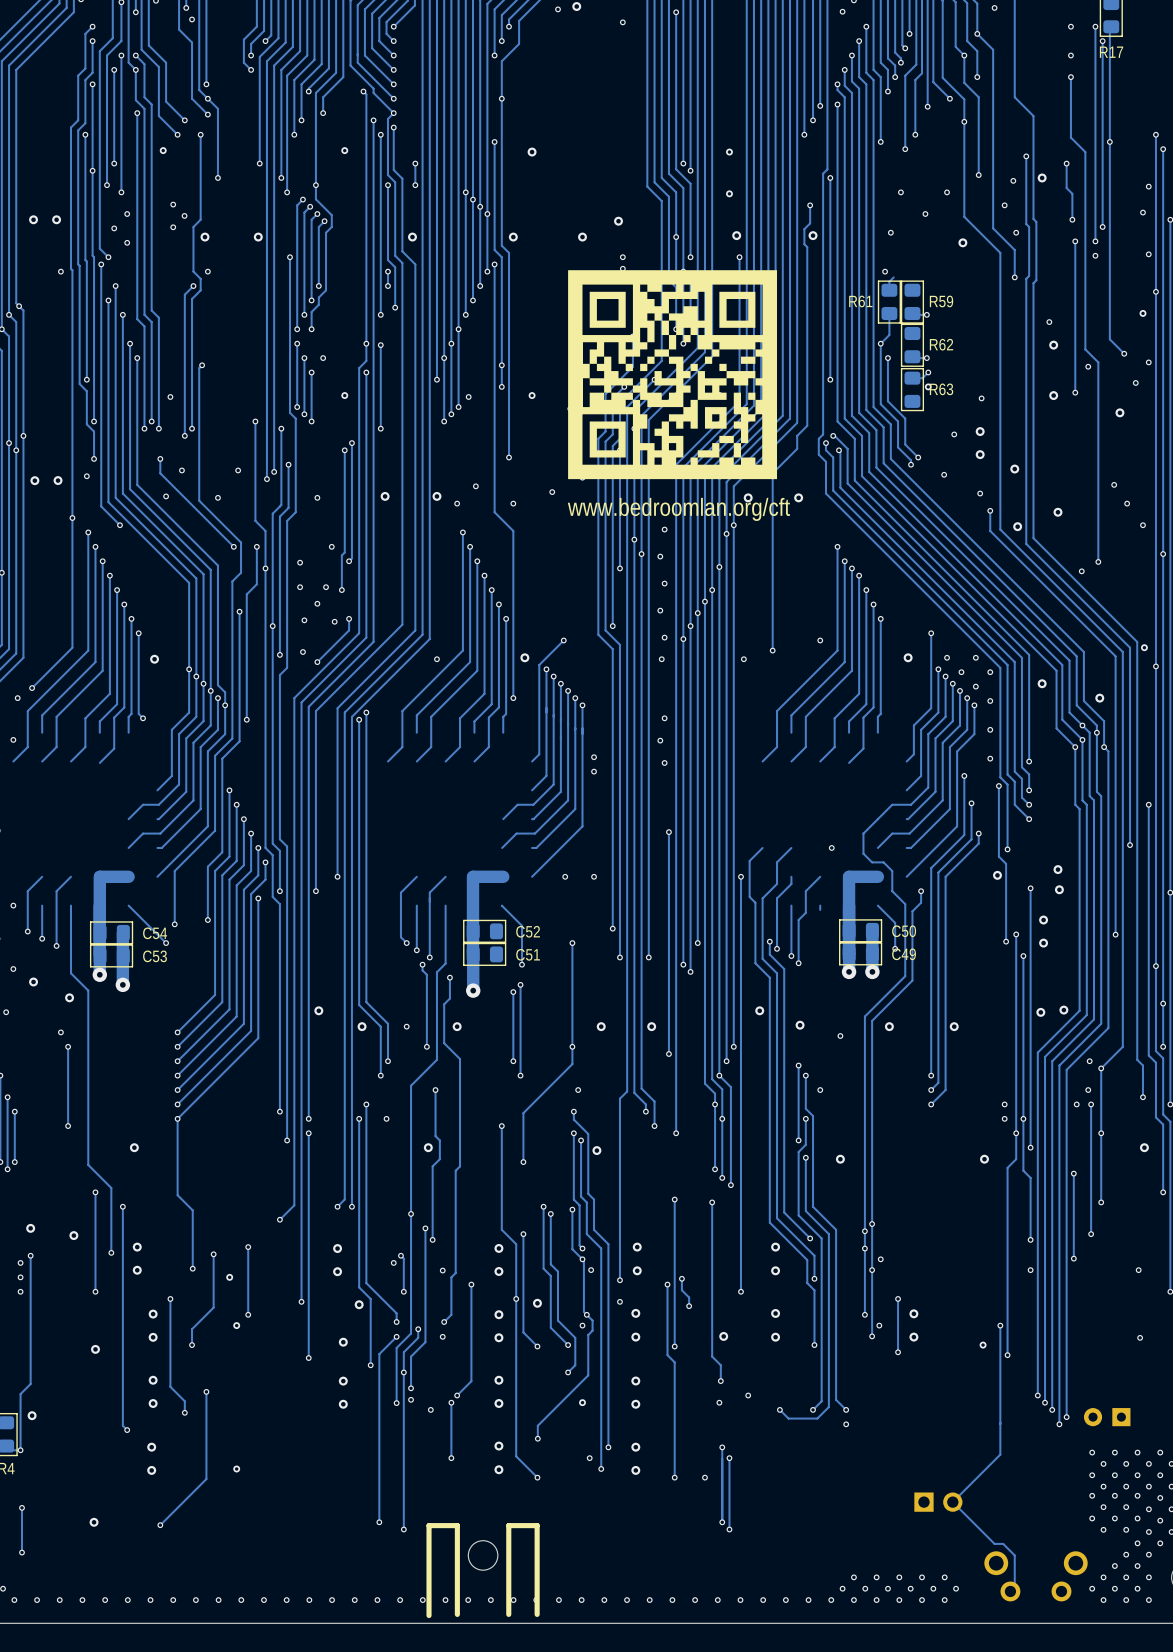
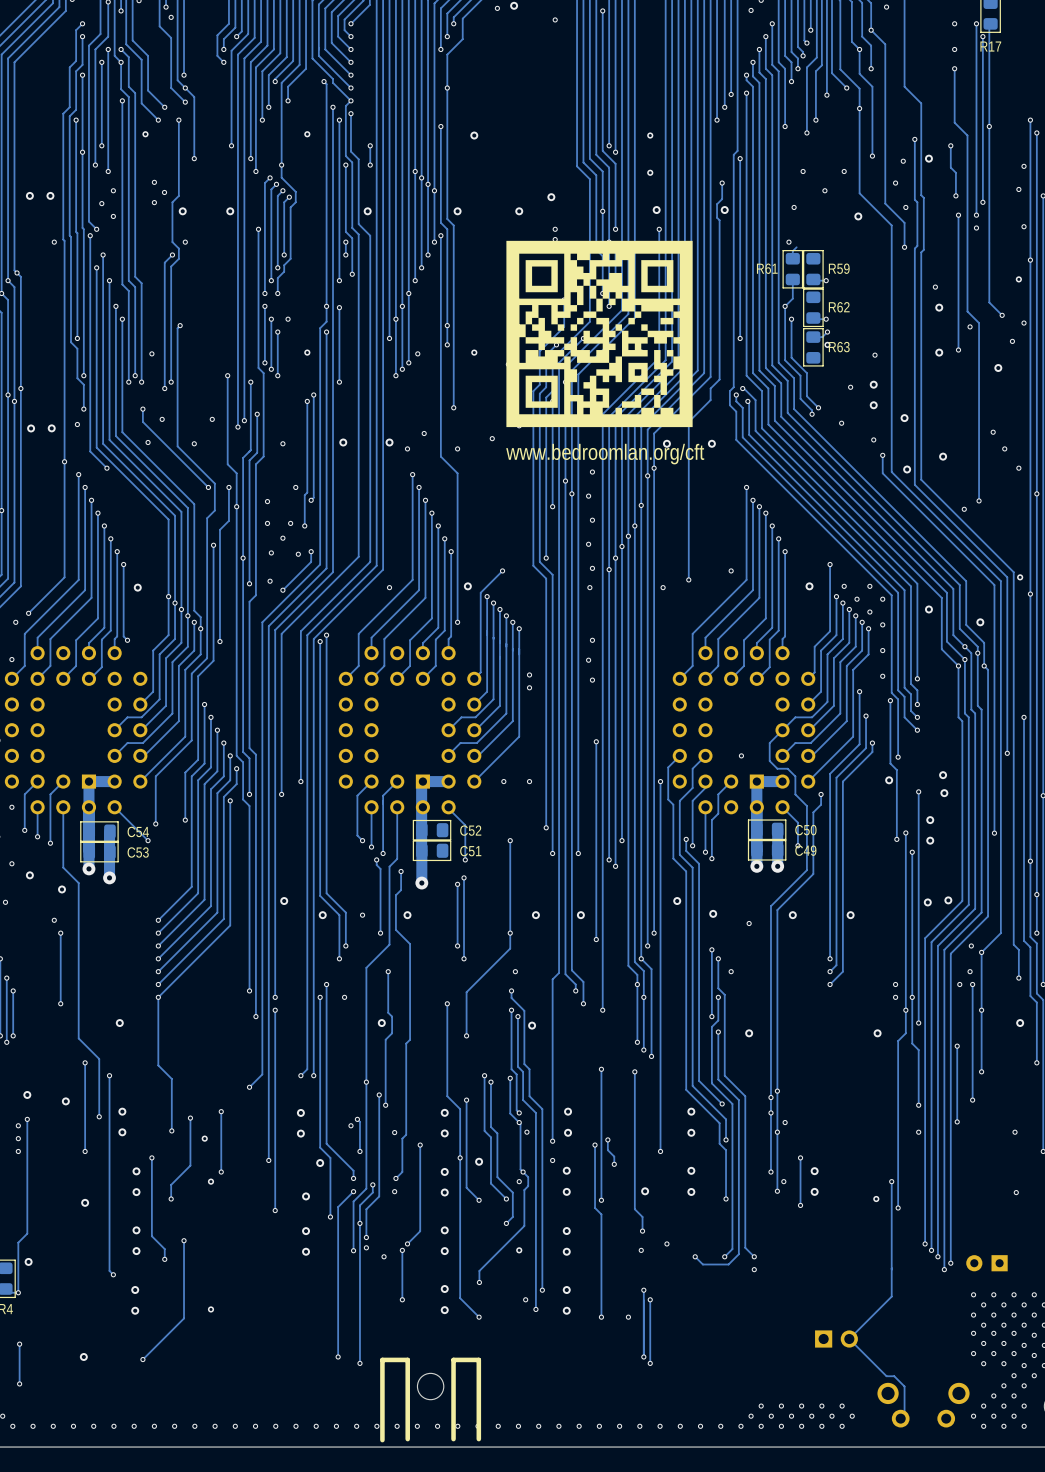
part: none -> (76, 730)
part: none -> (410, 730)
part: none -> (744, 730)

